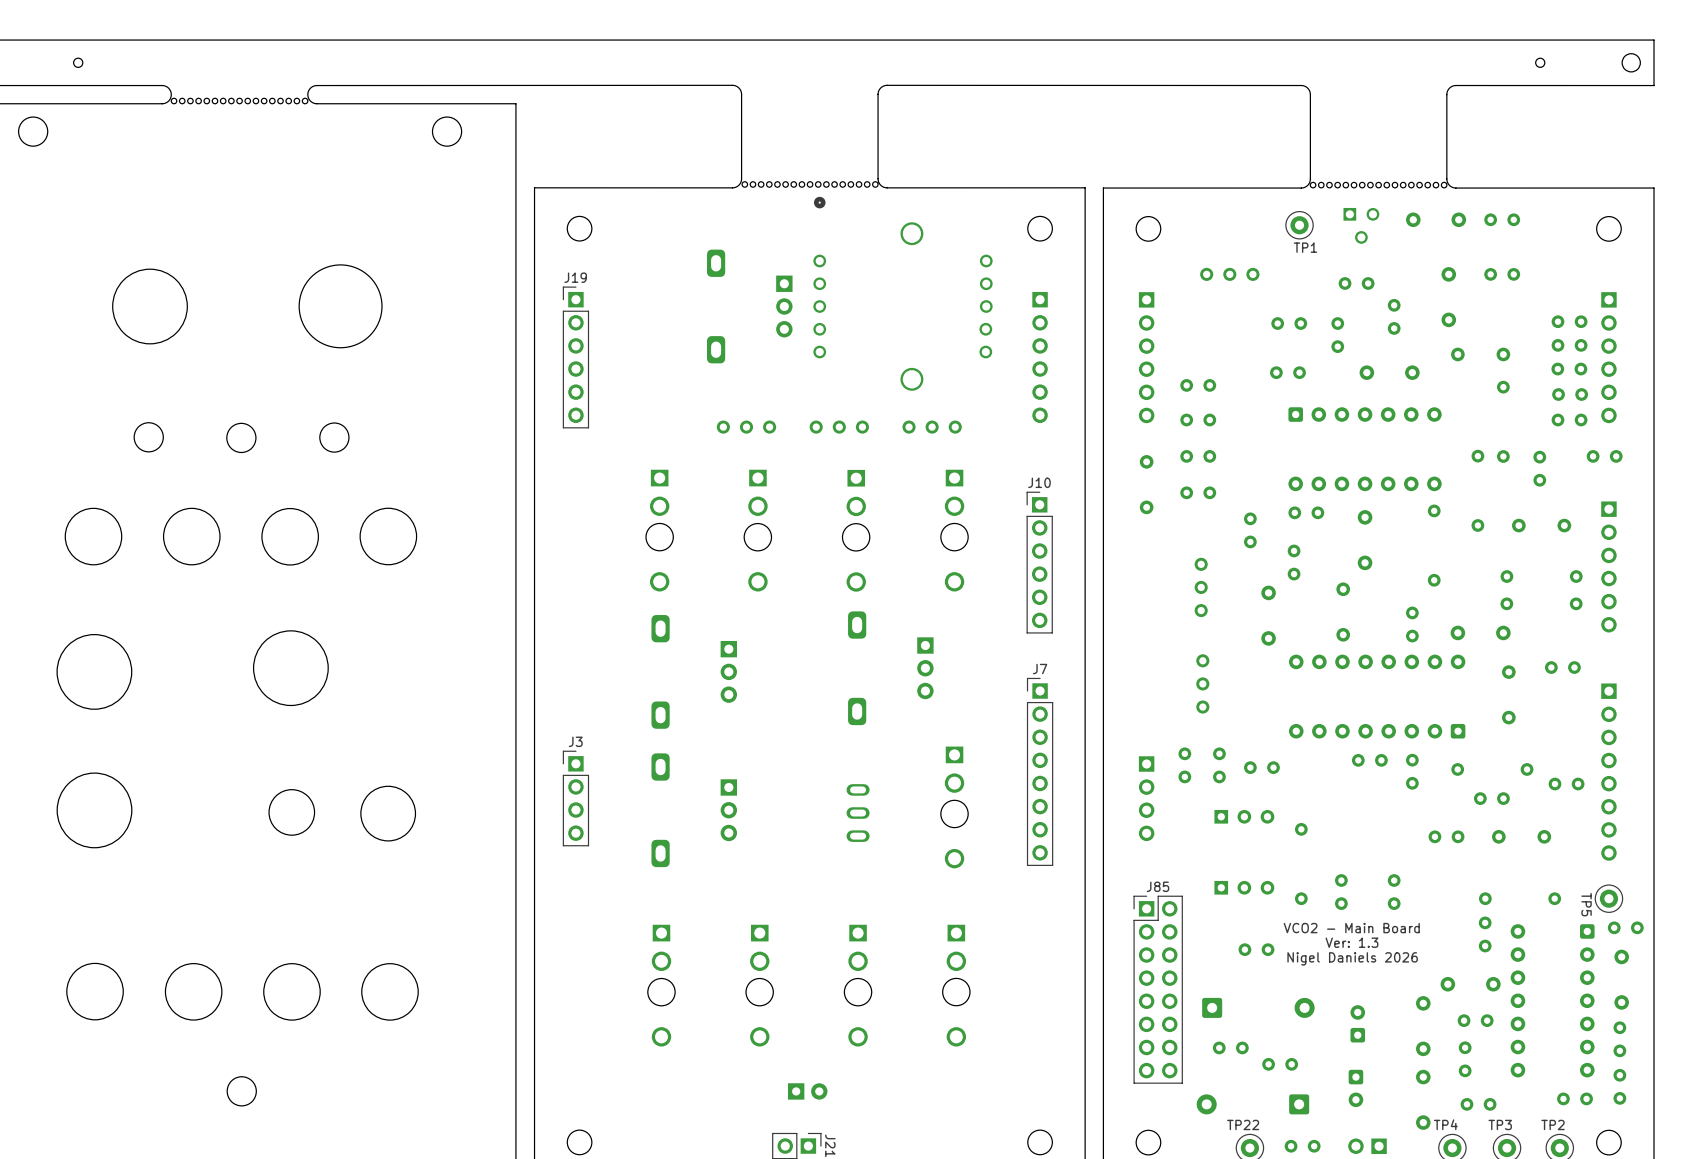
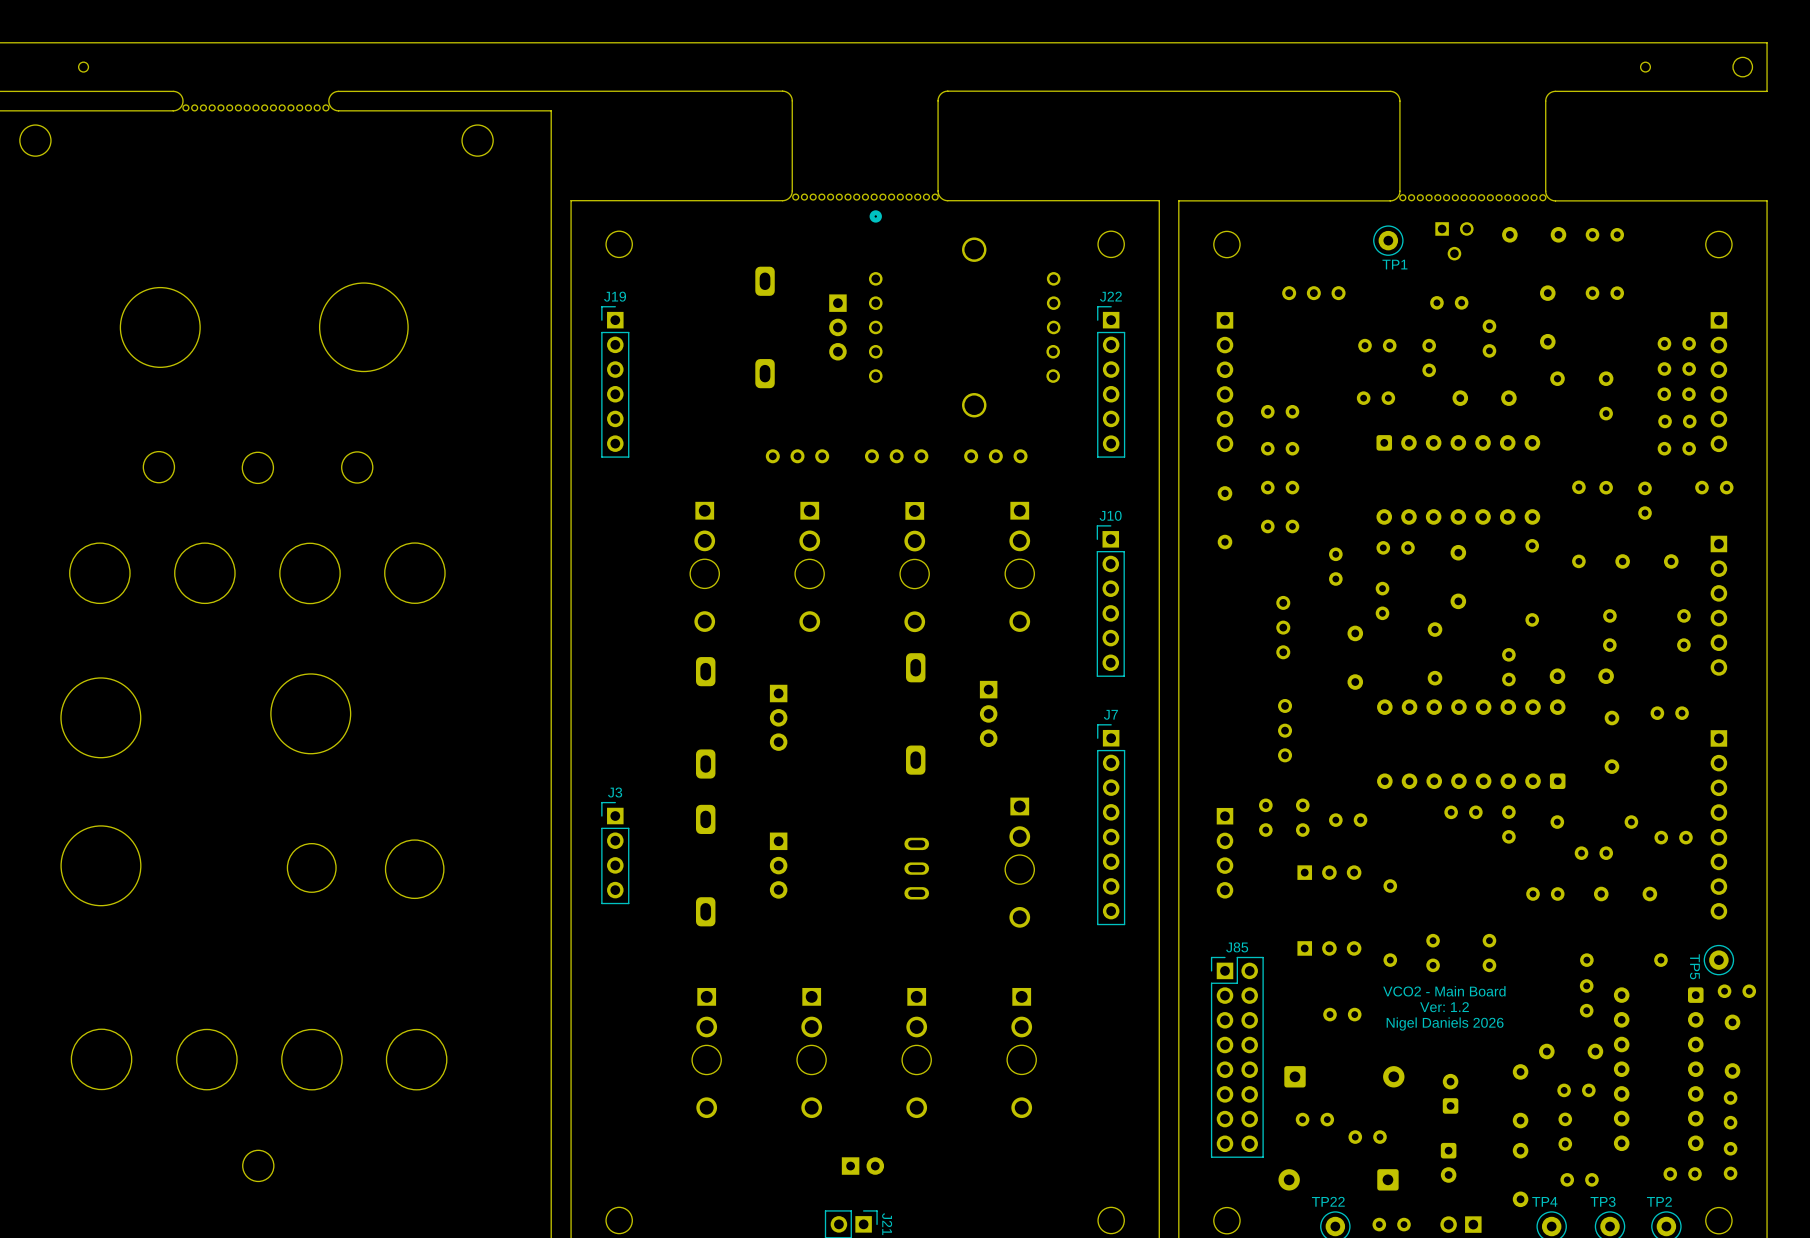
J22: none -> (1111, 381)
text: Ver: 1.3 (1351, 942) -> Ver: 1.2 (1444, 1007)

